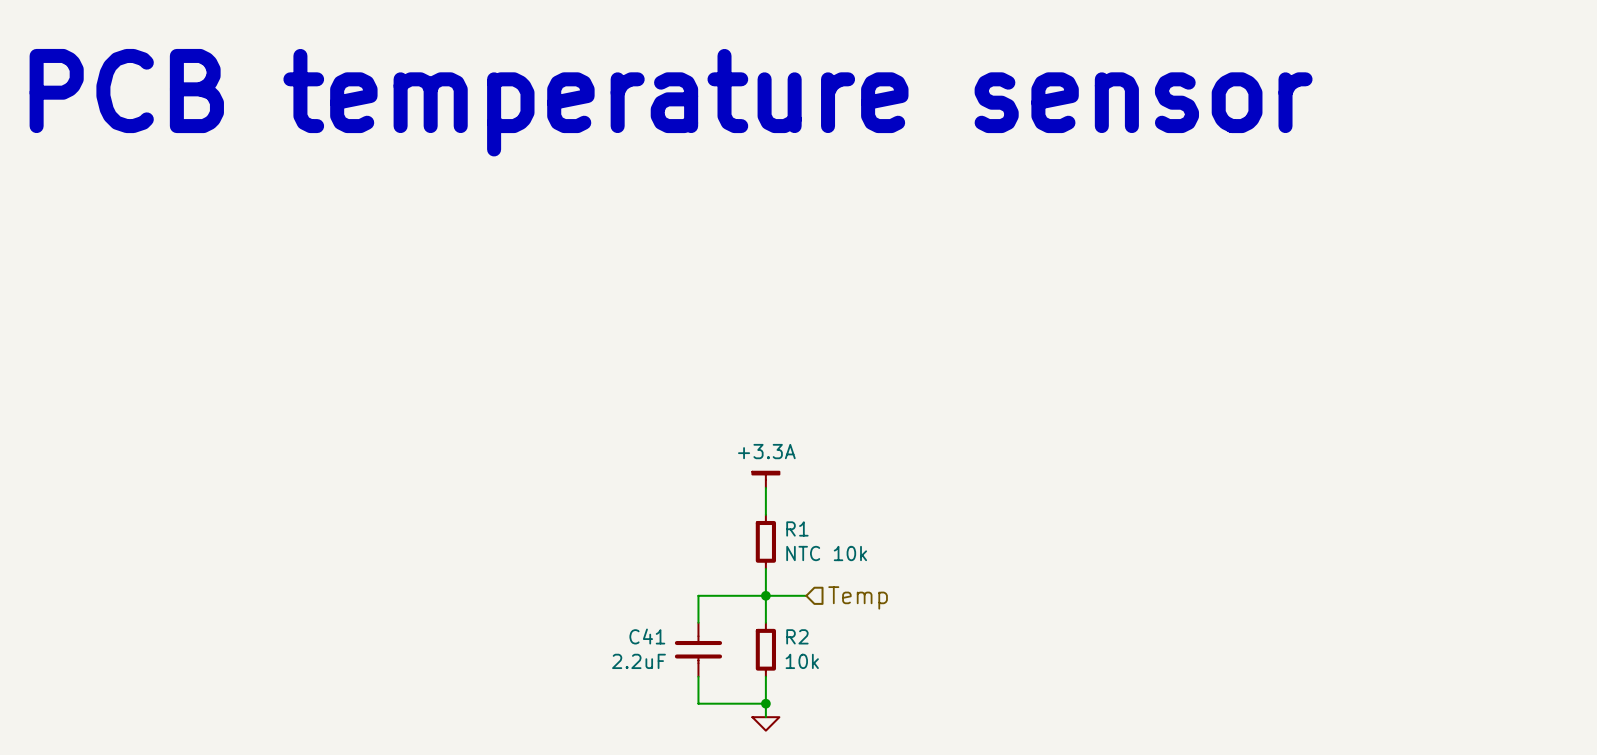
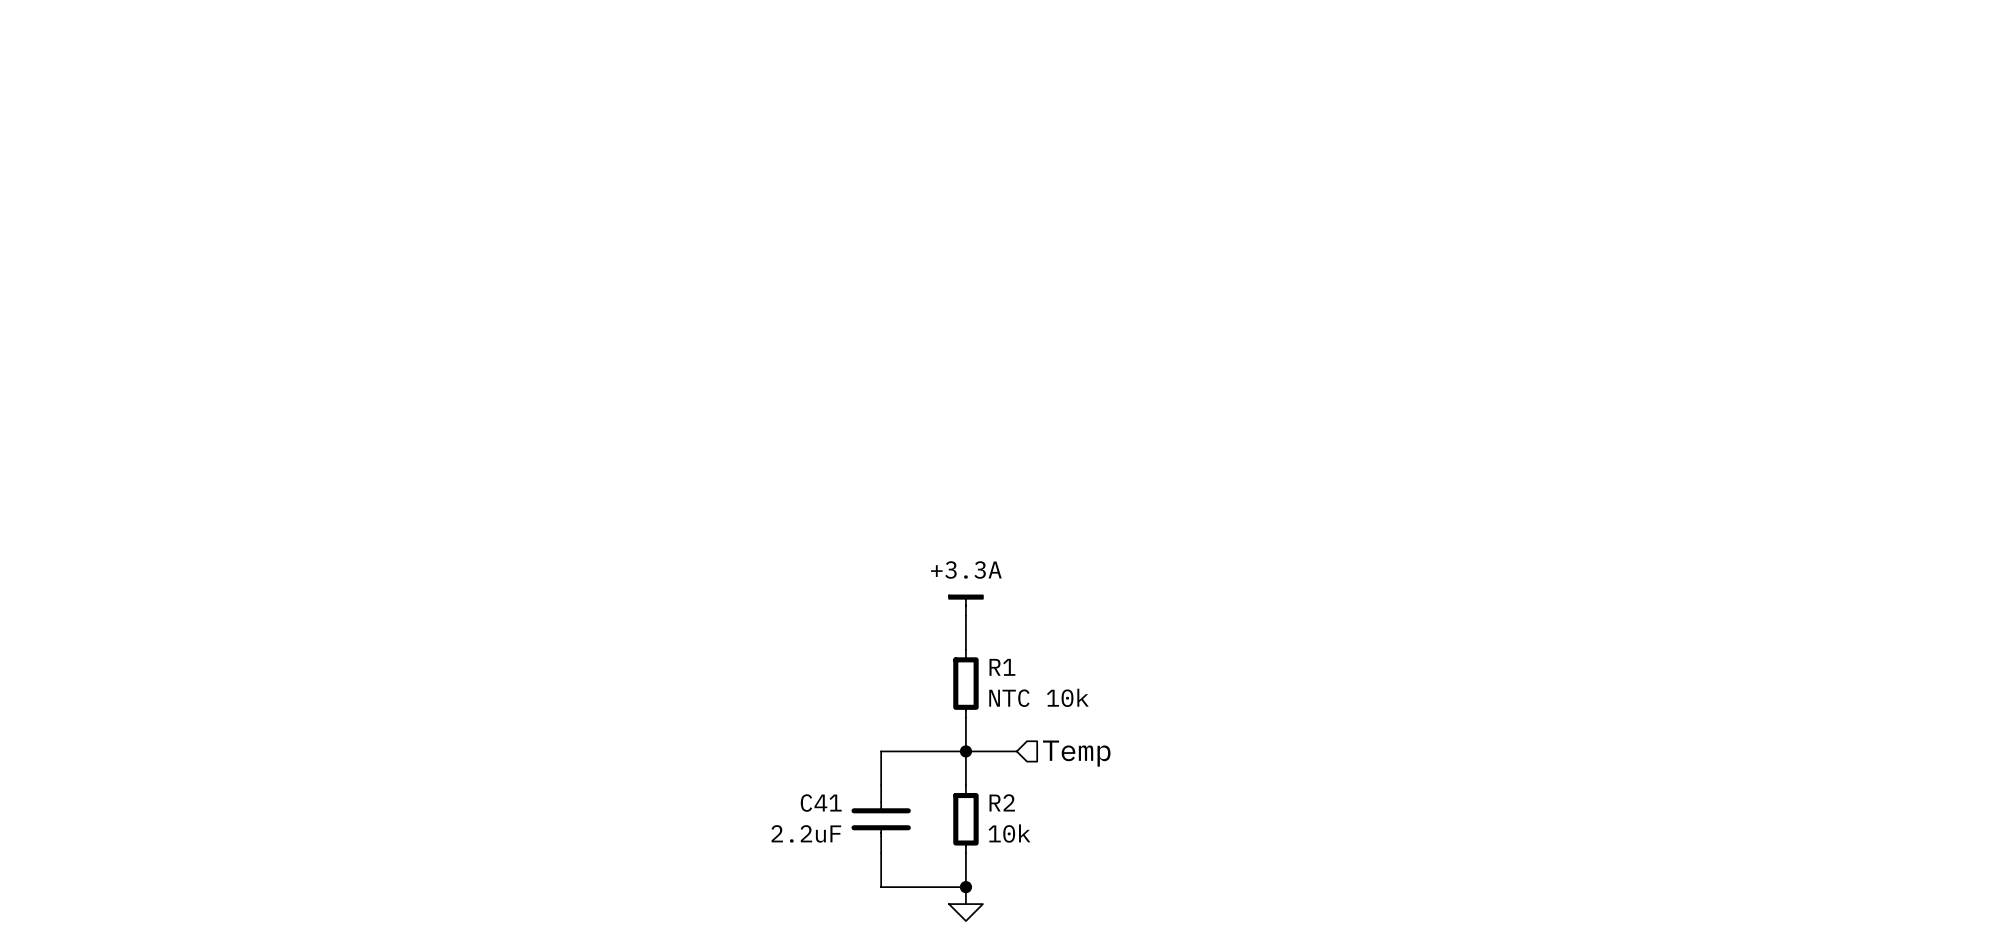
text: PCB temperature sensor (671, 102) -> none

